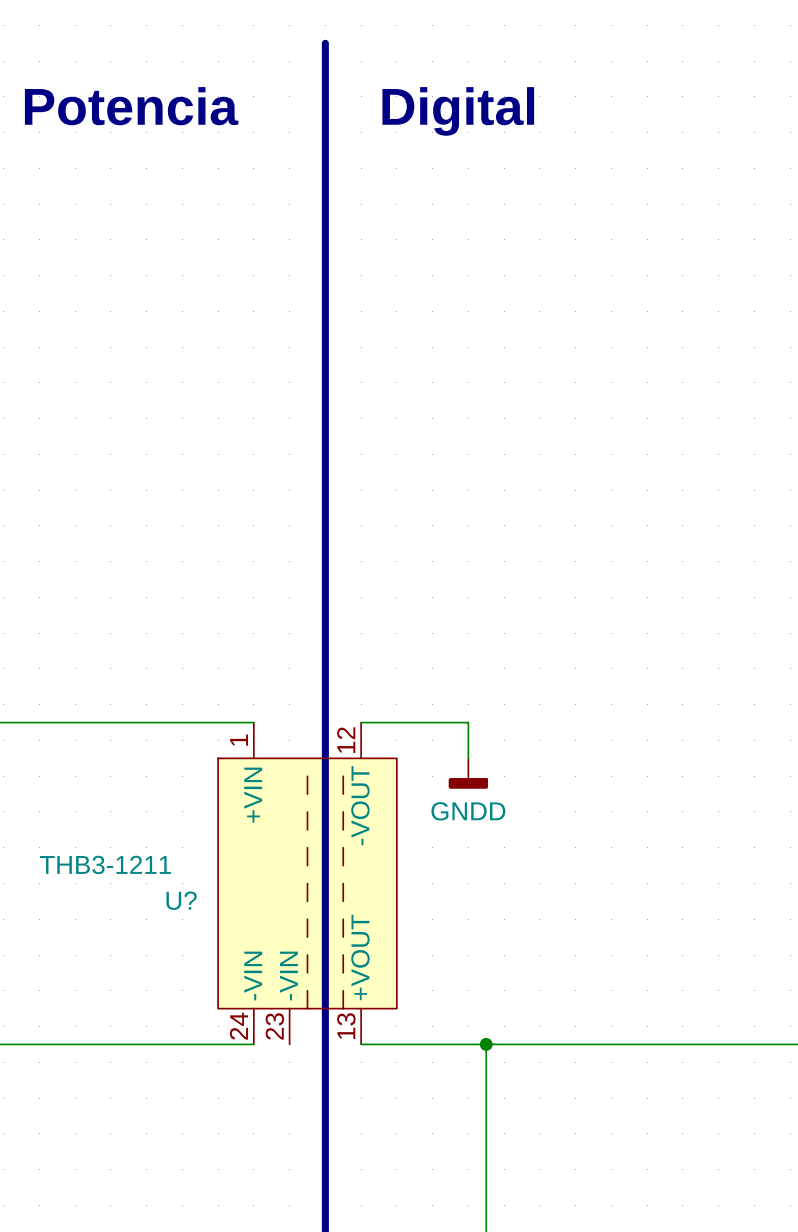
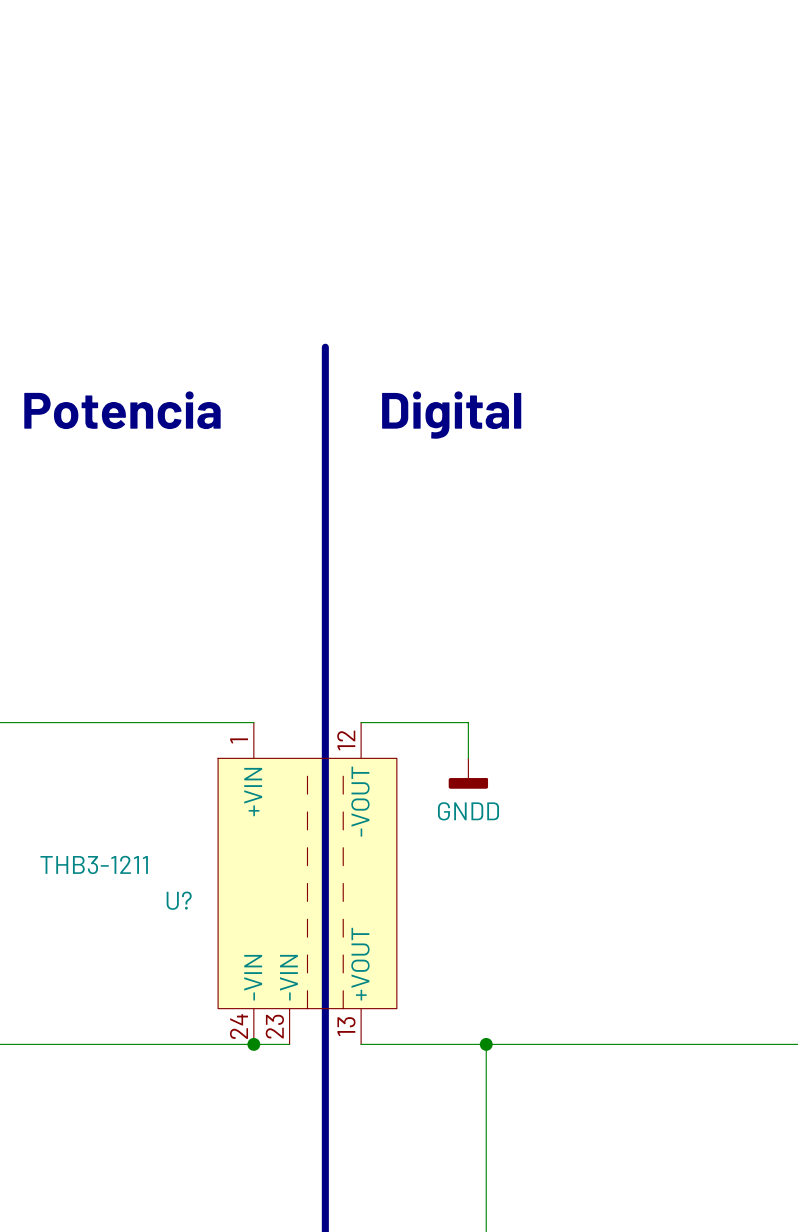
line: (325, 43) (325, 347) -> none
text position: Potencia (131, 106) -> Potencia (122, 410)
text position: Digital (458, 111) -> Digital (451, 415)
wire: none -> (253, 1044) (289, 1044)
junction: none -> (253, 1044)

